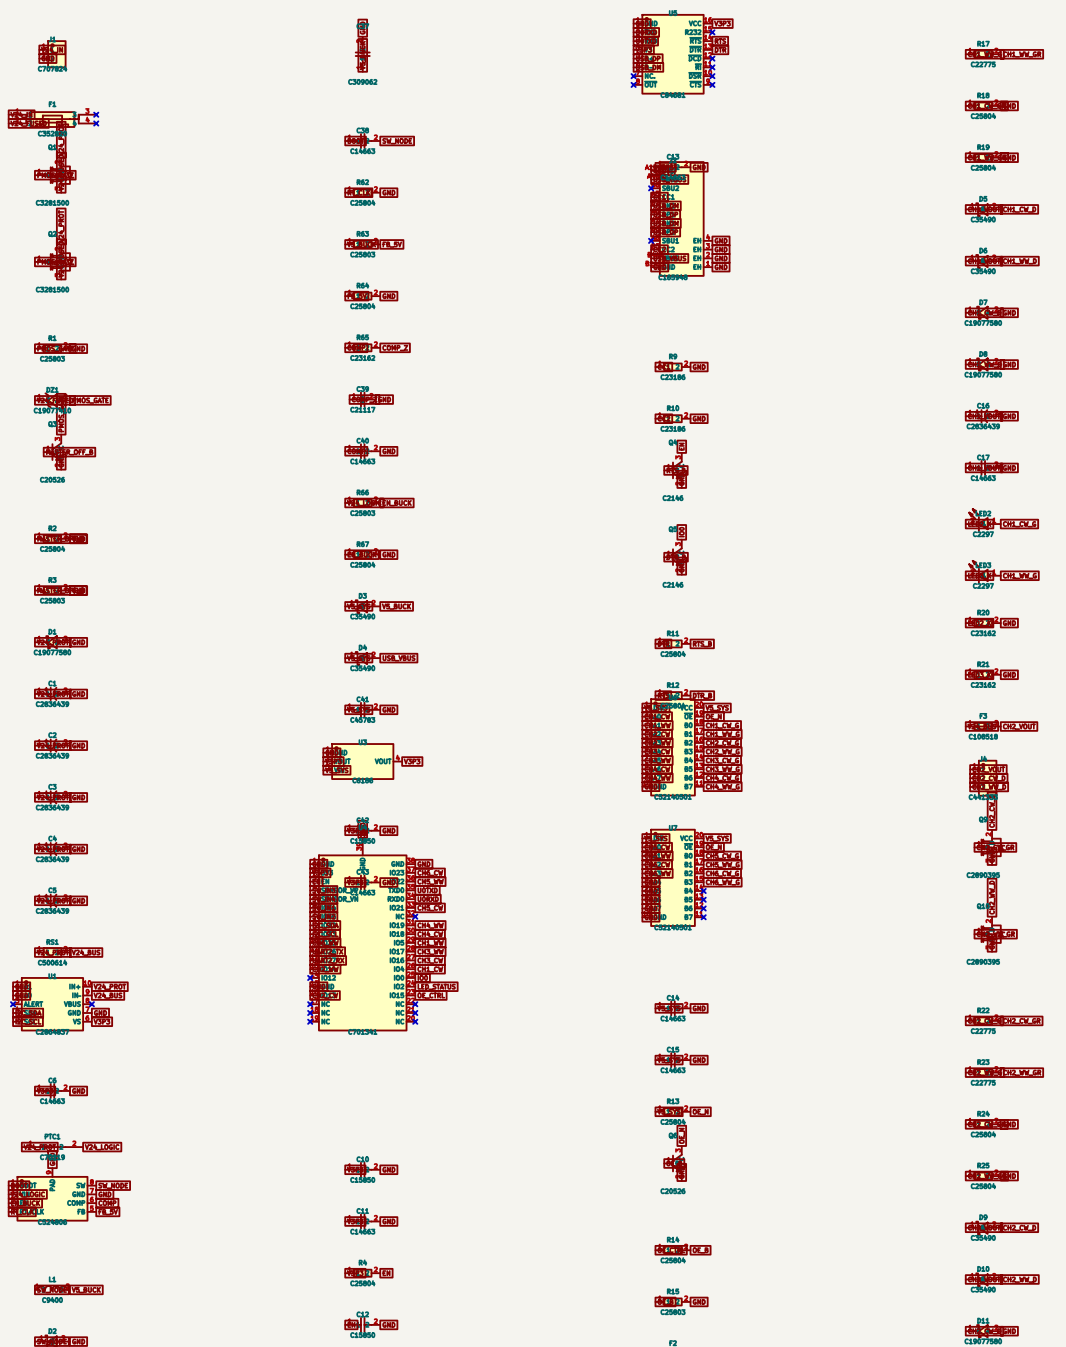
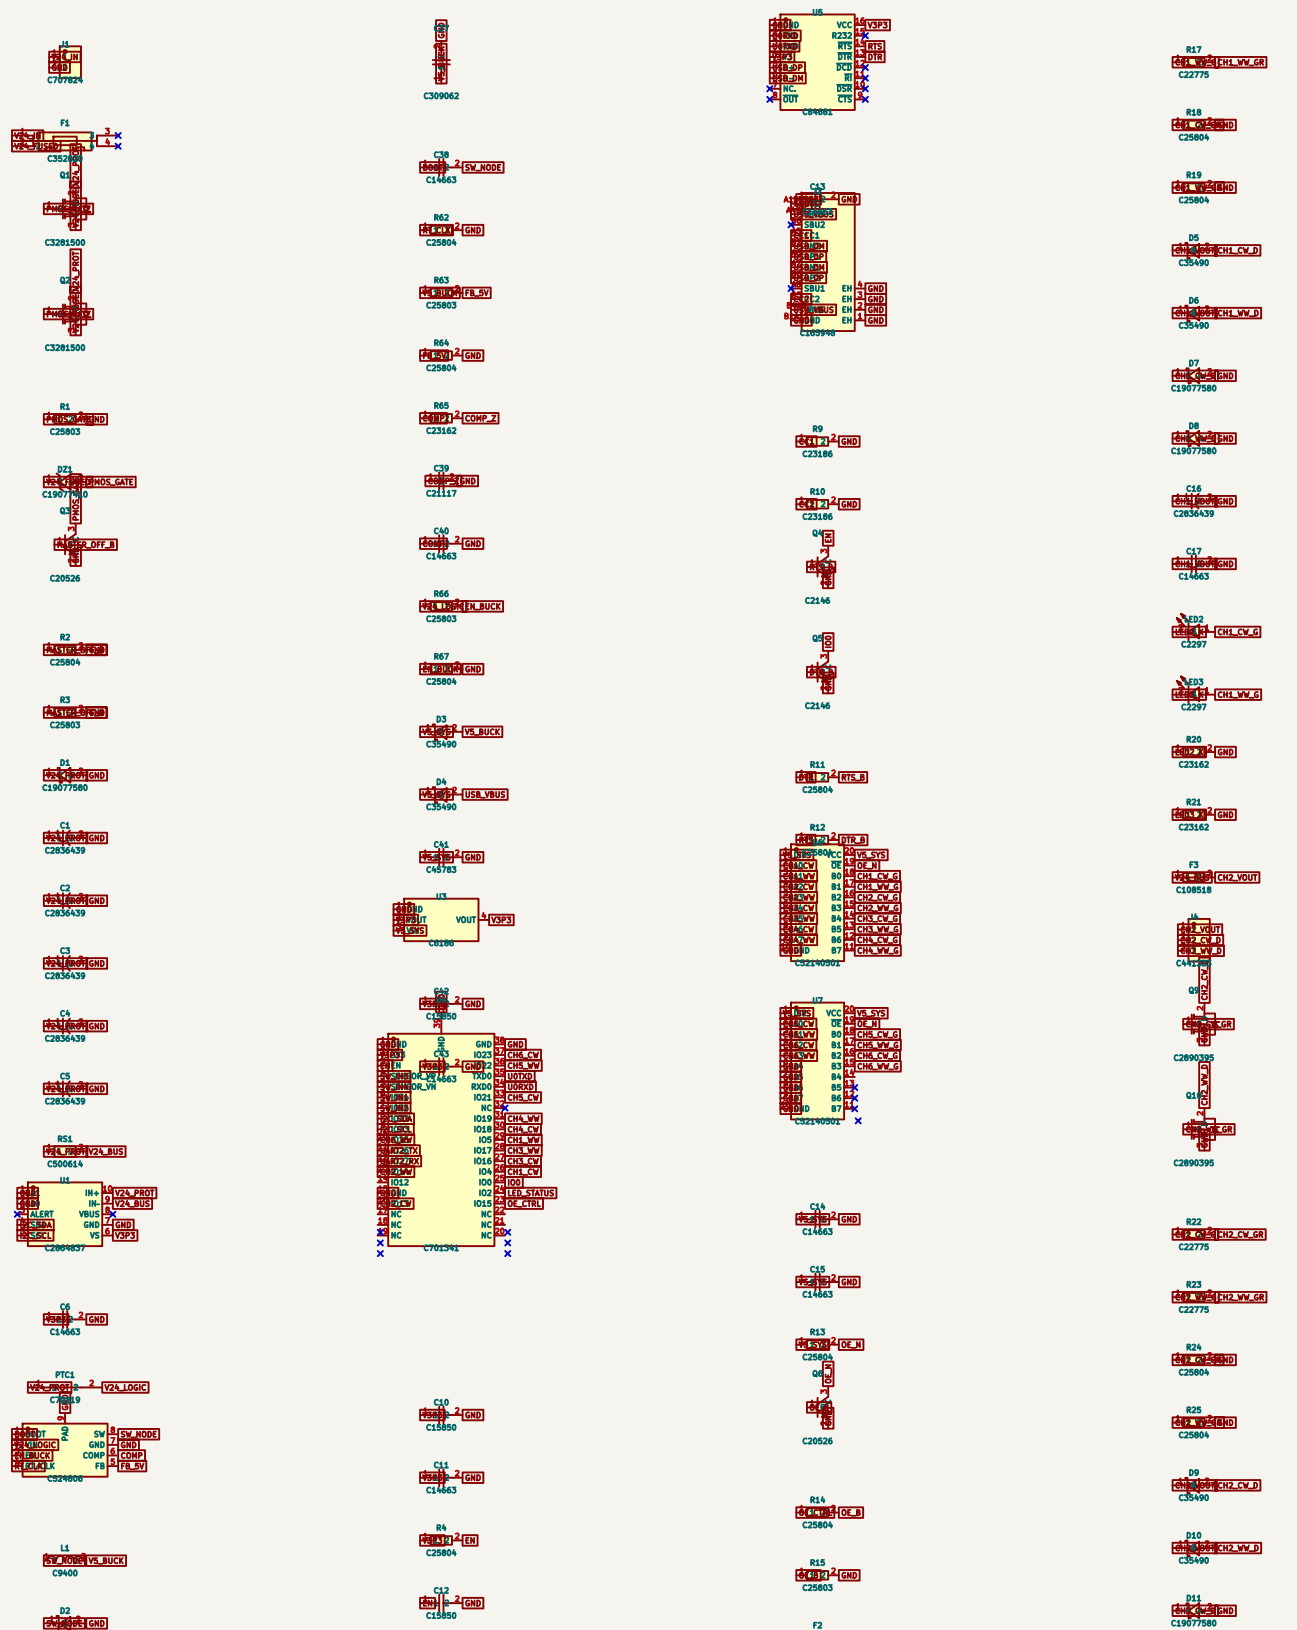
no-connect mark: (703, 890) -> none
no-connect mark: none -> (858, 1120)
no-connect mark: (310, 977) -> none
no-connect mark: (310, 1004) -> none
no-connect mark: (415, 1004) -> none
no-connect mark: (310, 1012) -> none
no-connect mark: (415, 1012) -> none
no-connect mark: none -> (380, 1232)
no-connect mark: none -> (507, 1232)
no-connect mark: (310, 1021) -> none
no-connect mark: (415, 1021) -> none
no-connect mark: none -> (380, 1242)
no-connect mark: none -> (507, 1242)
no-connect mark: none -> (380, 1253)
no-connect mark: none -> (507, 1253)

